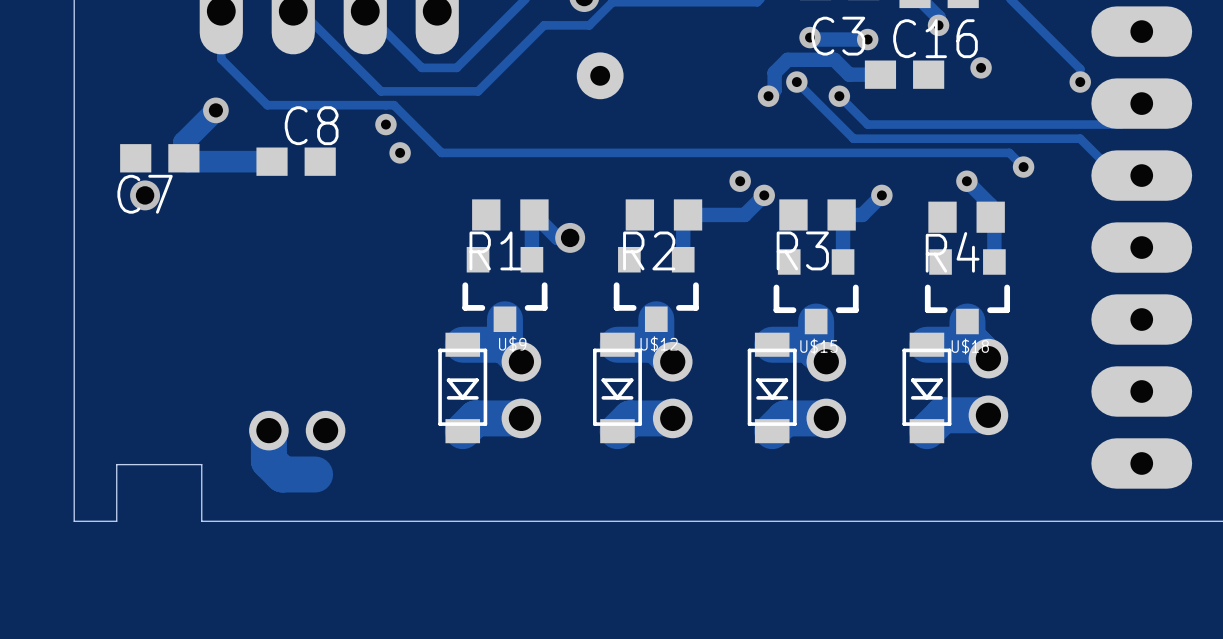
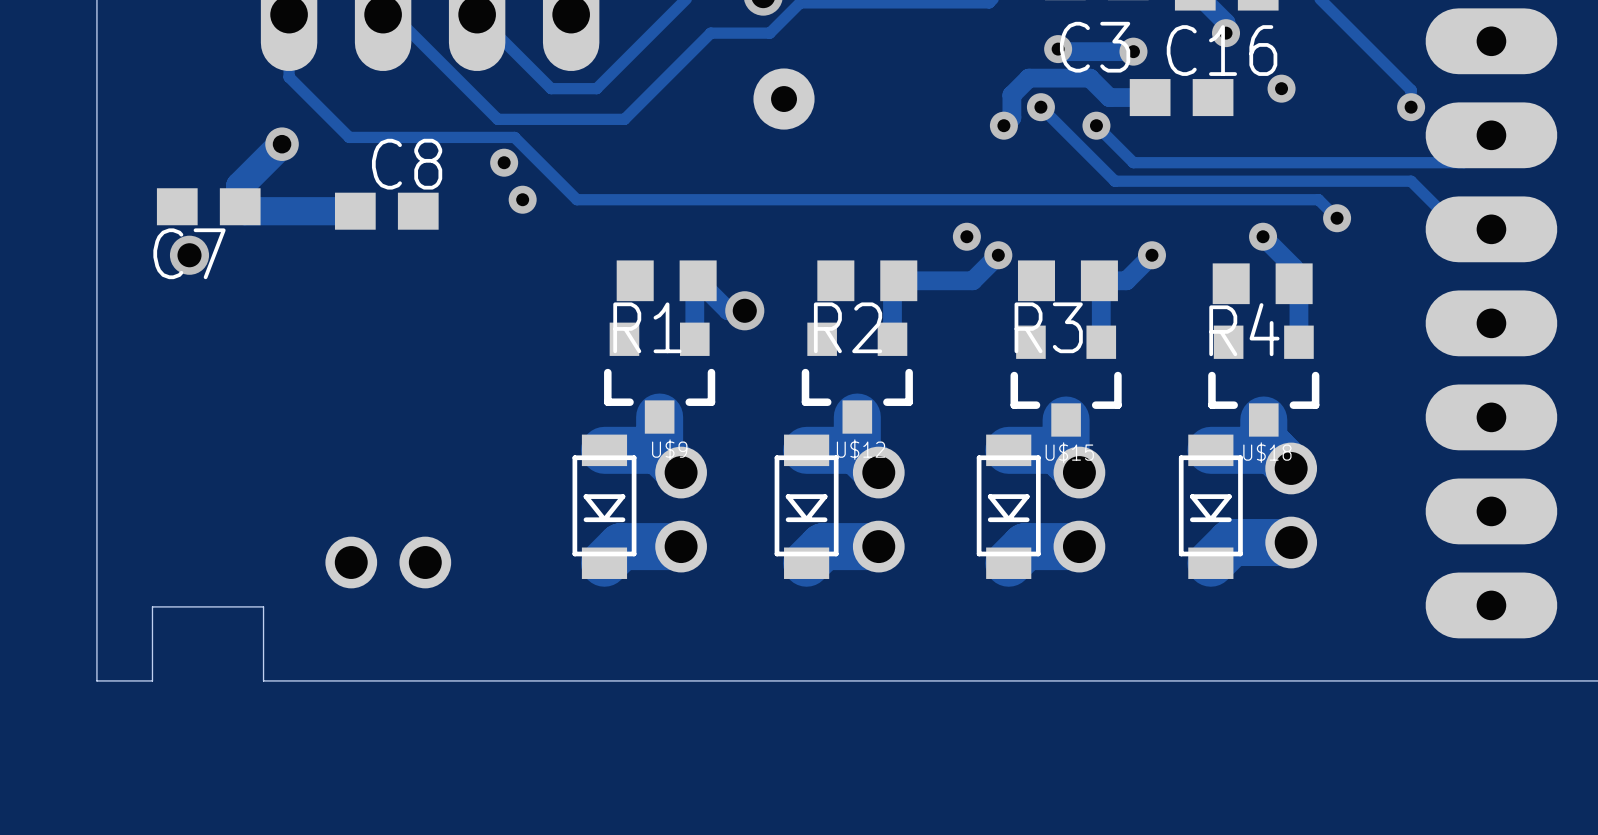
track: (268, 430) (268, 460) (282, 474) (315, 474) -> none

